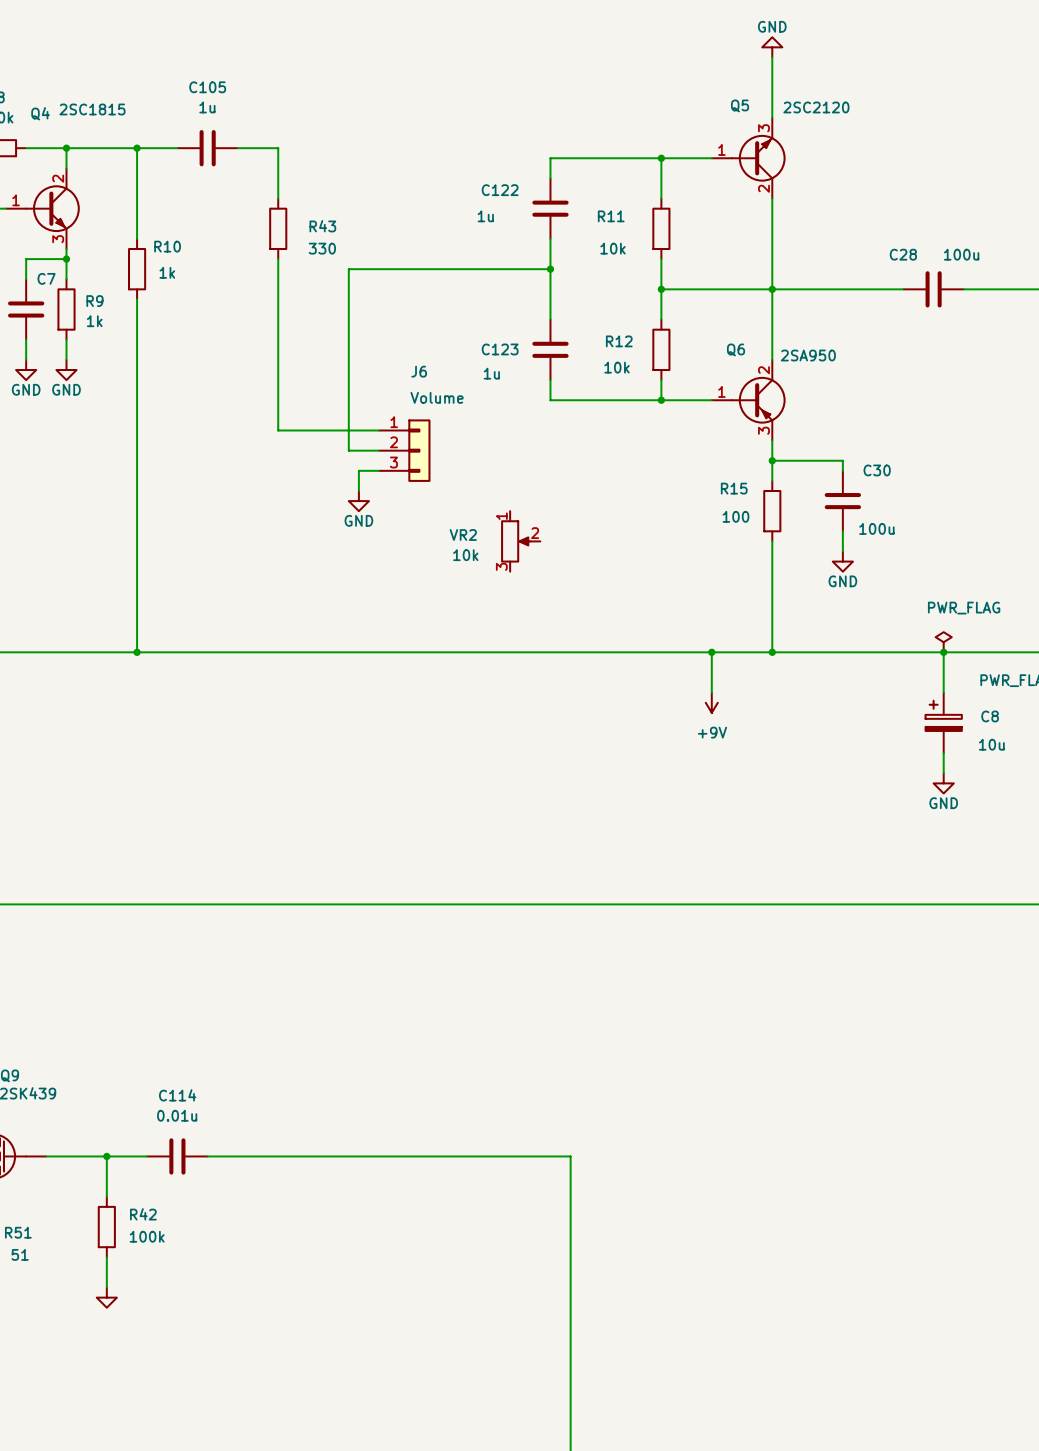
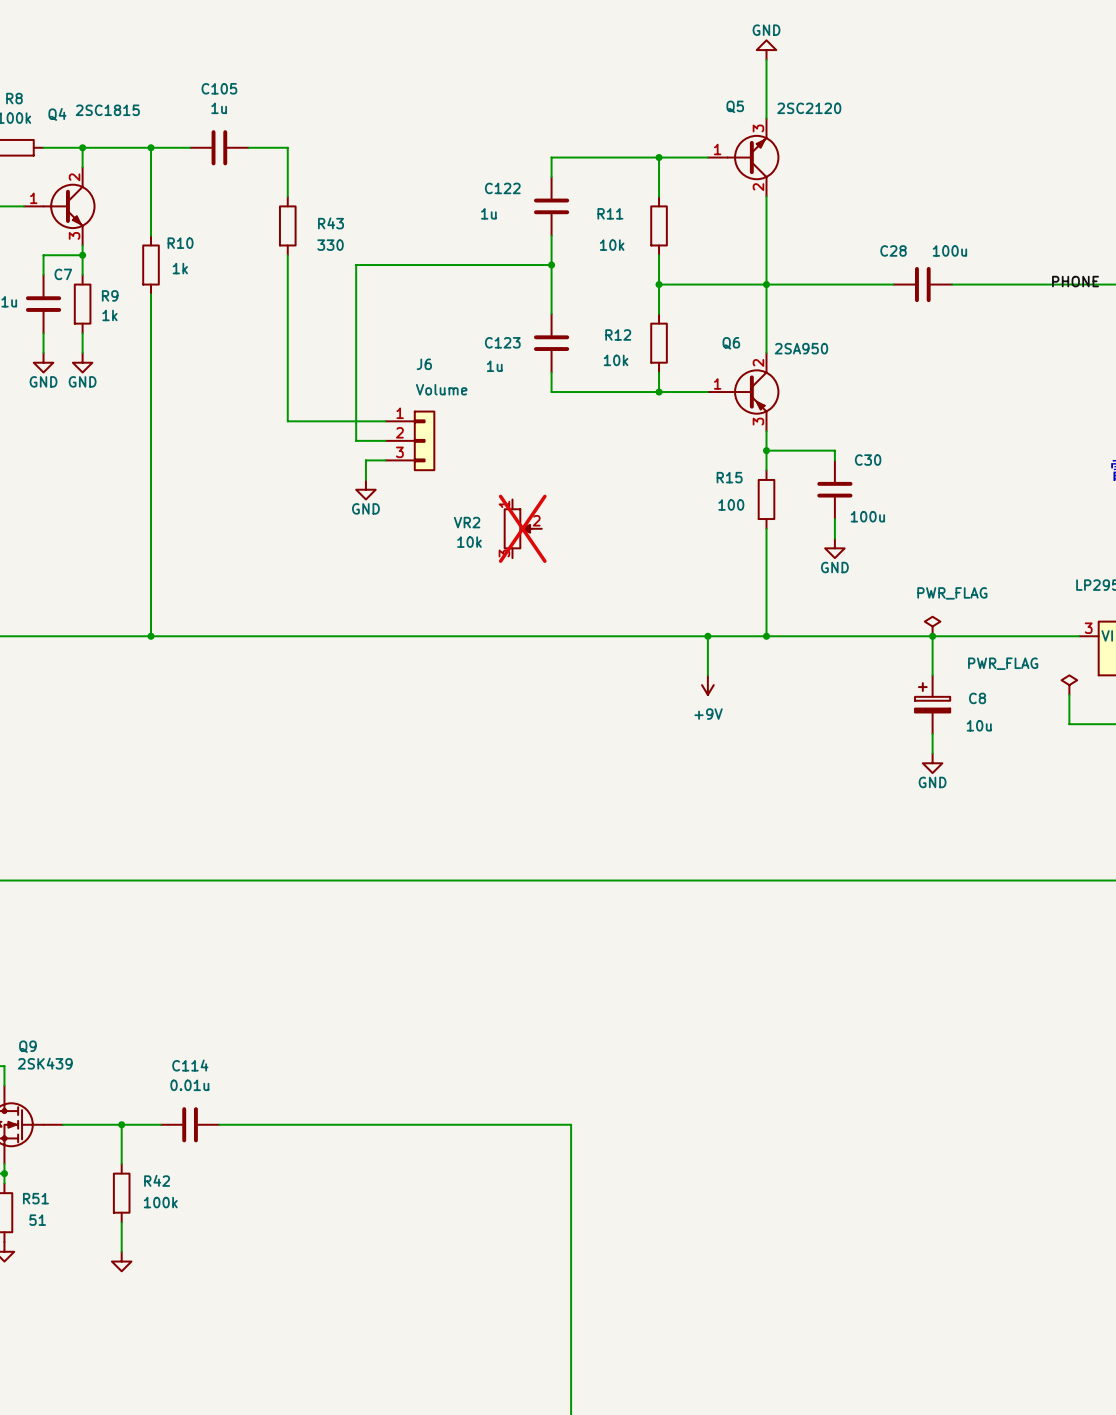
VR2 do-not-place cross: none -> (522, 528)

